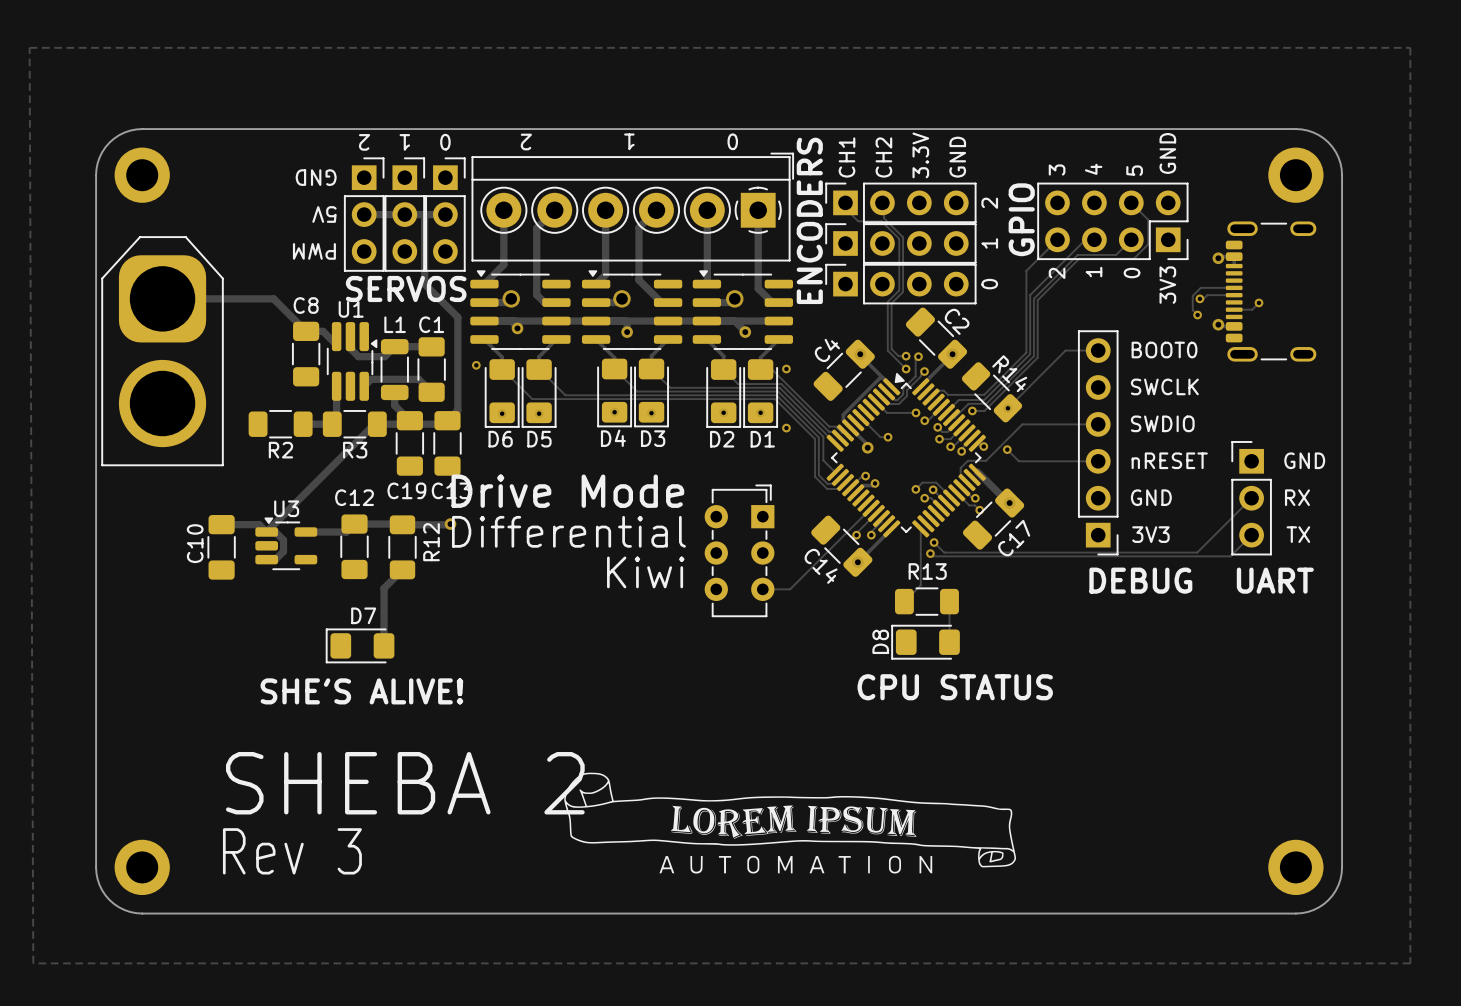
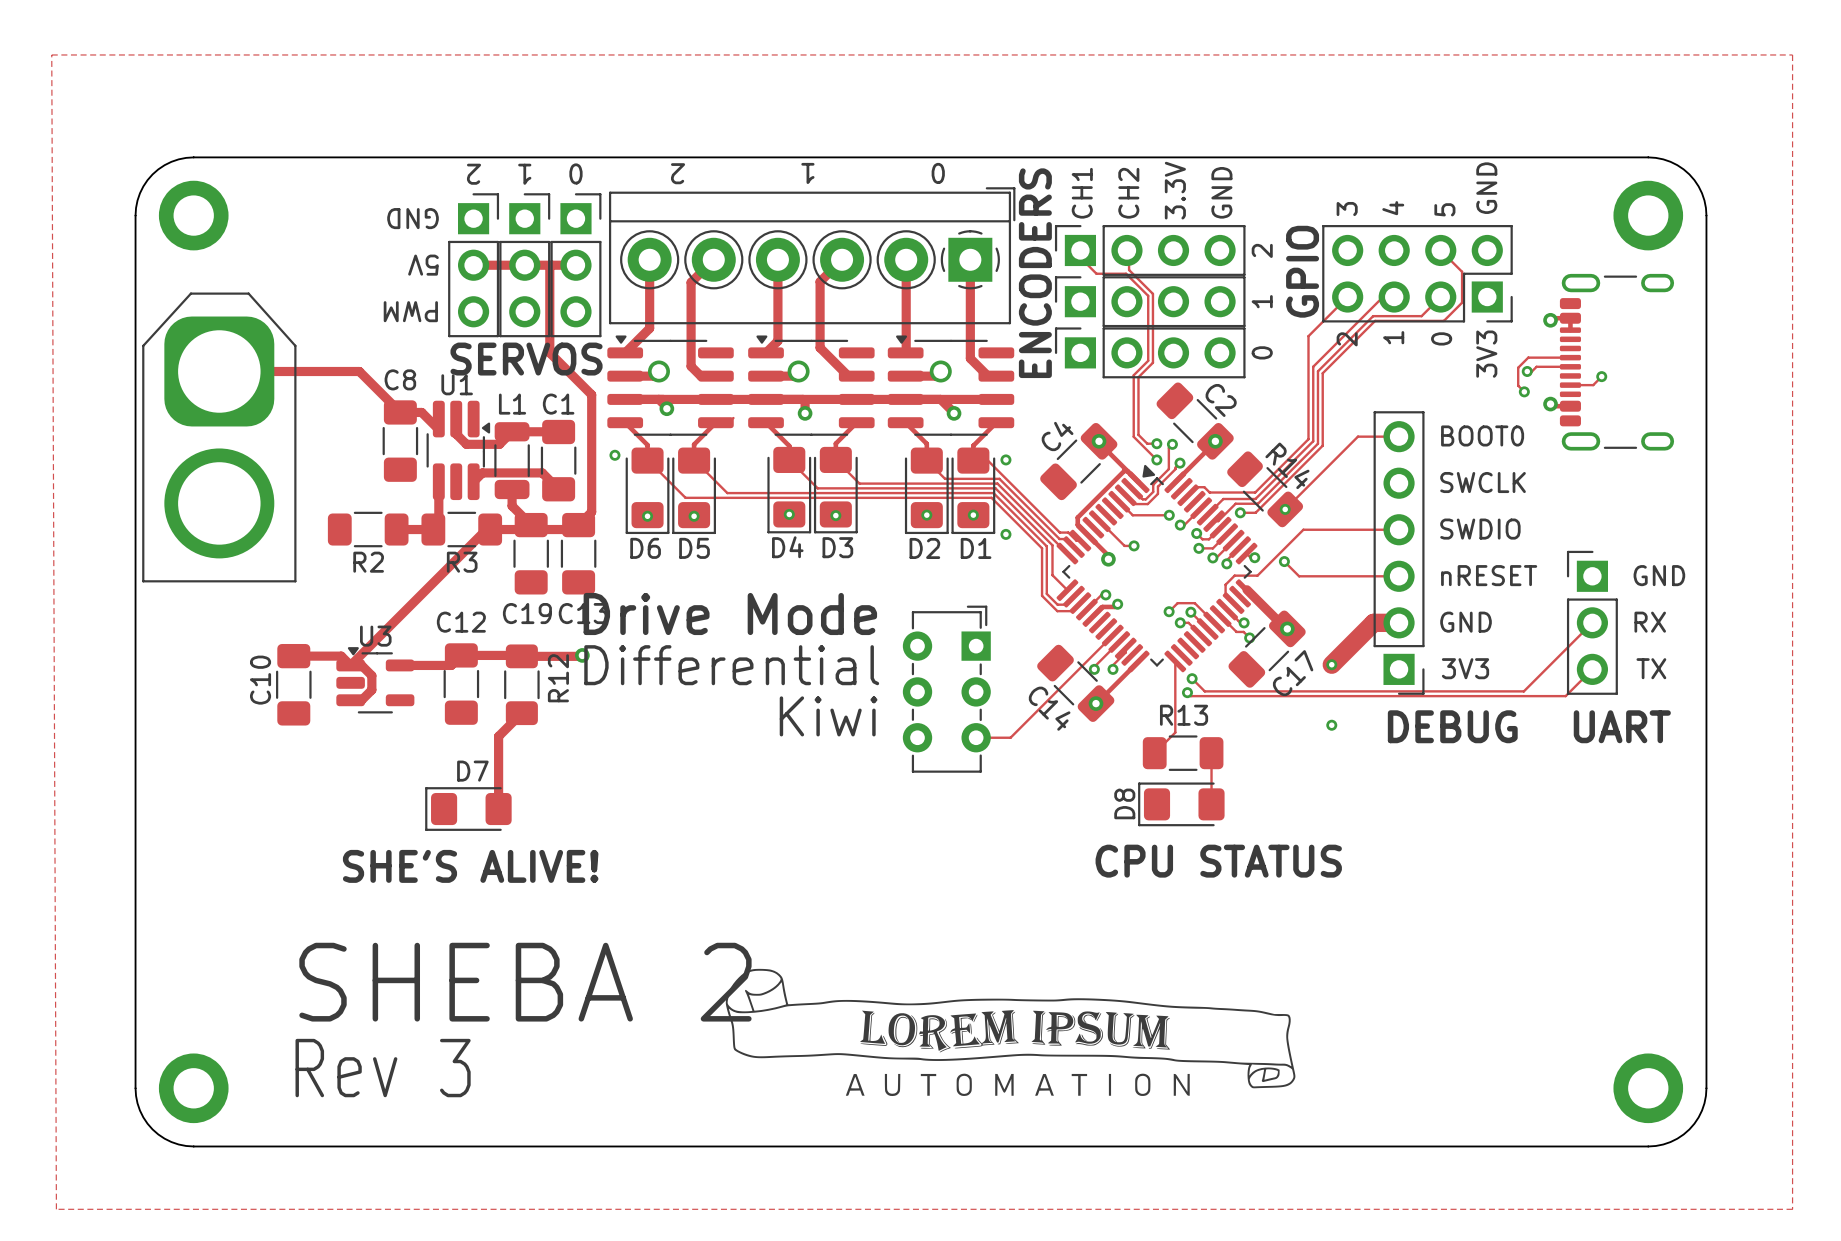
track: none -> (1399, 622) (1373, 622) (1331, 664)
via: none -> (1331, 664)
via: none -> (1331, 725)

